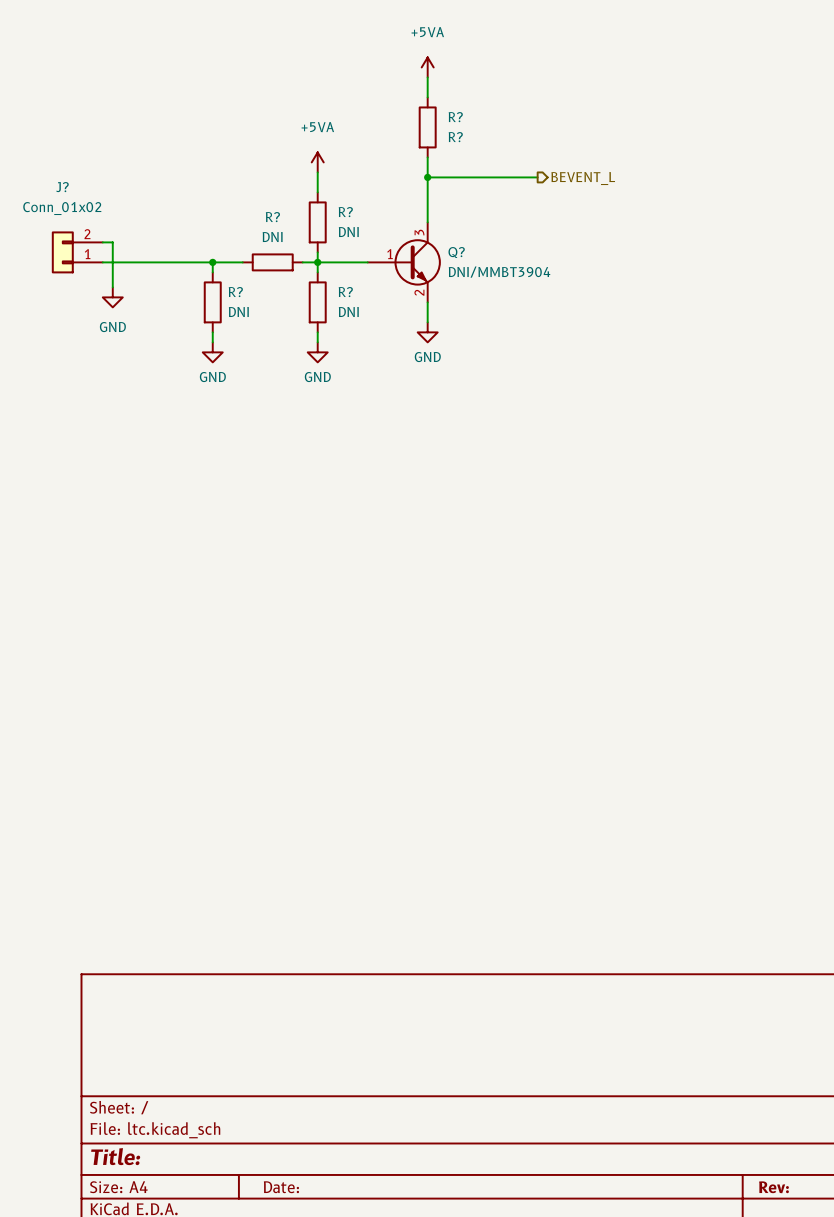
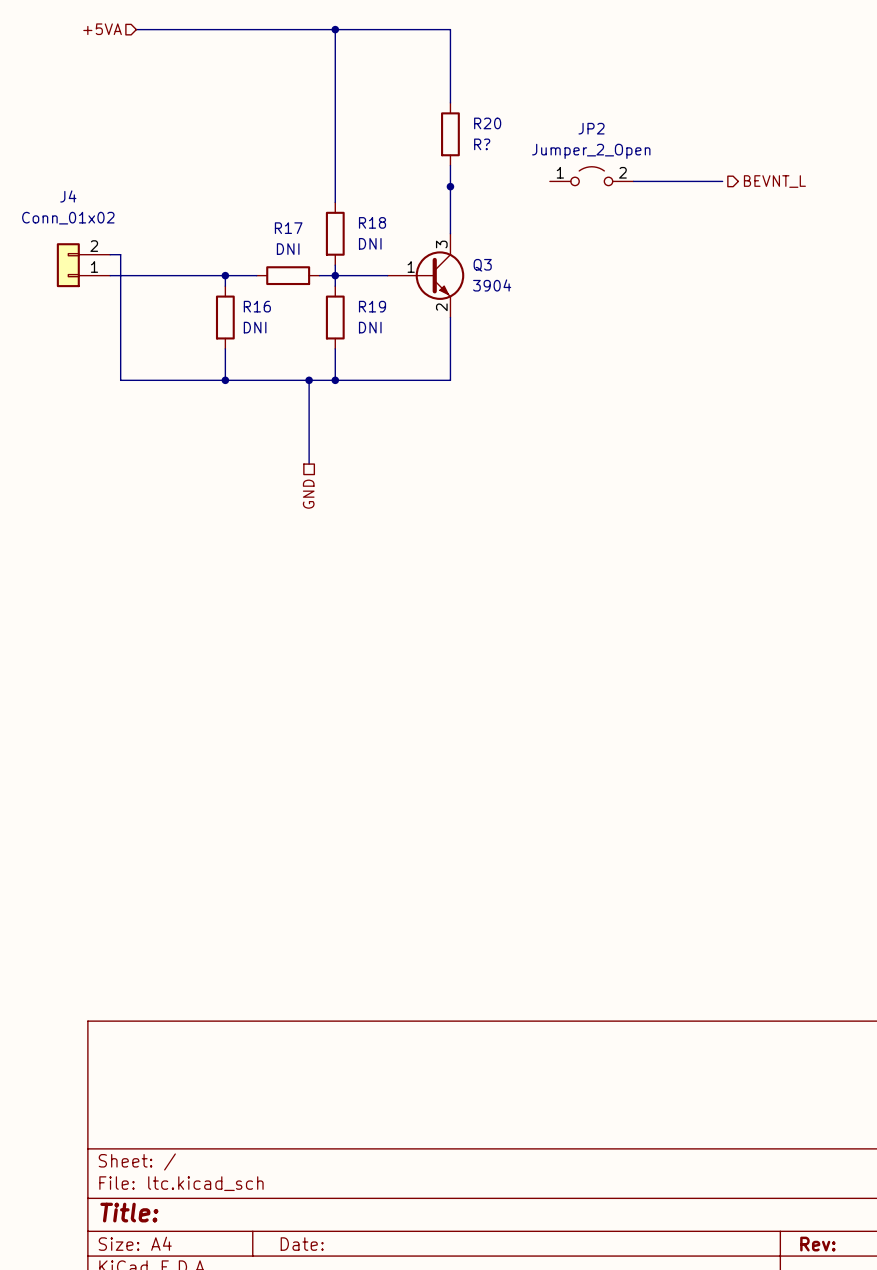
hierarchical label: none -> +5VA (102, 29)
wire: none -> (136, 29) (450, 29) (450, 81)
wire: none -> (335, 29) (335, 181)
junction: none -> (335, 29)
power symbol: +5VA (427, 67) -> none
R? name: R? (455, 117) -> R20 (487, 123)
power symbol: +5VA (317, 162) -> none
JP2: none -> Jumper_2_Open (591, 176)
wire: none -> (633, 181) (722, 181)
hierarchical label: none -> BEVNT_L (774, 181)
wire: (427, 177) (537, 177) -> none
hierarchical label: BEVENT_L (583, 178) -> none
J? name: J? (62, 187) -> J4 (68, 196)
R? name: R? (345, 212) -> R18 (372, 222)
R? name: R? (272, 217) -> R17 (288, 228)
Q? name: Q? (456, 252) -> Q3 (482, 265)
Q? value: DNI/MMBT3904 (499, 272) -> 3904 (492, 285)
wire: none -> (120, 301) (120, 380) (450, 380) (450, 338)
R? name: R? (235, 292) -> R16 (257, 306)
R? name: R? (345, 292) -> R19 (372, 306)
power symbol: GND (112, 297) -> none
power symbol: GND (427, 332) -> none
power symbol: GND (212, 352) -> none
power symbol: GND (317, 352) -> none
junction: none -> (225, 380)
wire: none -> (309, 380) (309, 464)
junction: none -> (309, 380)
junction: none -> (335, 380)
hierarchical label: none -> GND (308, 494)

